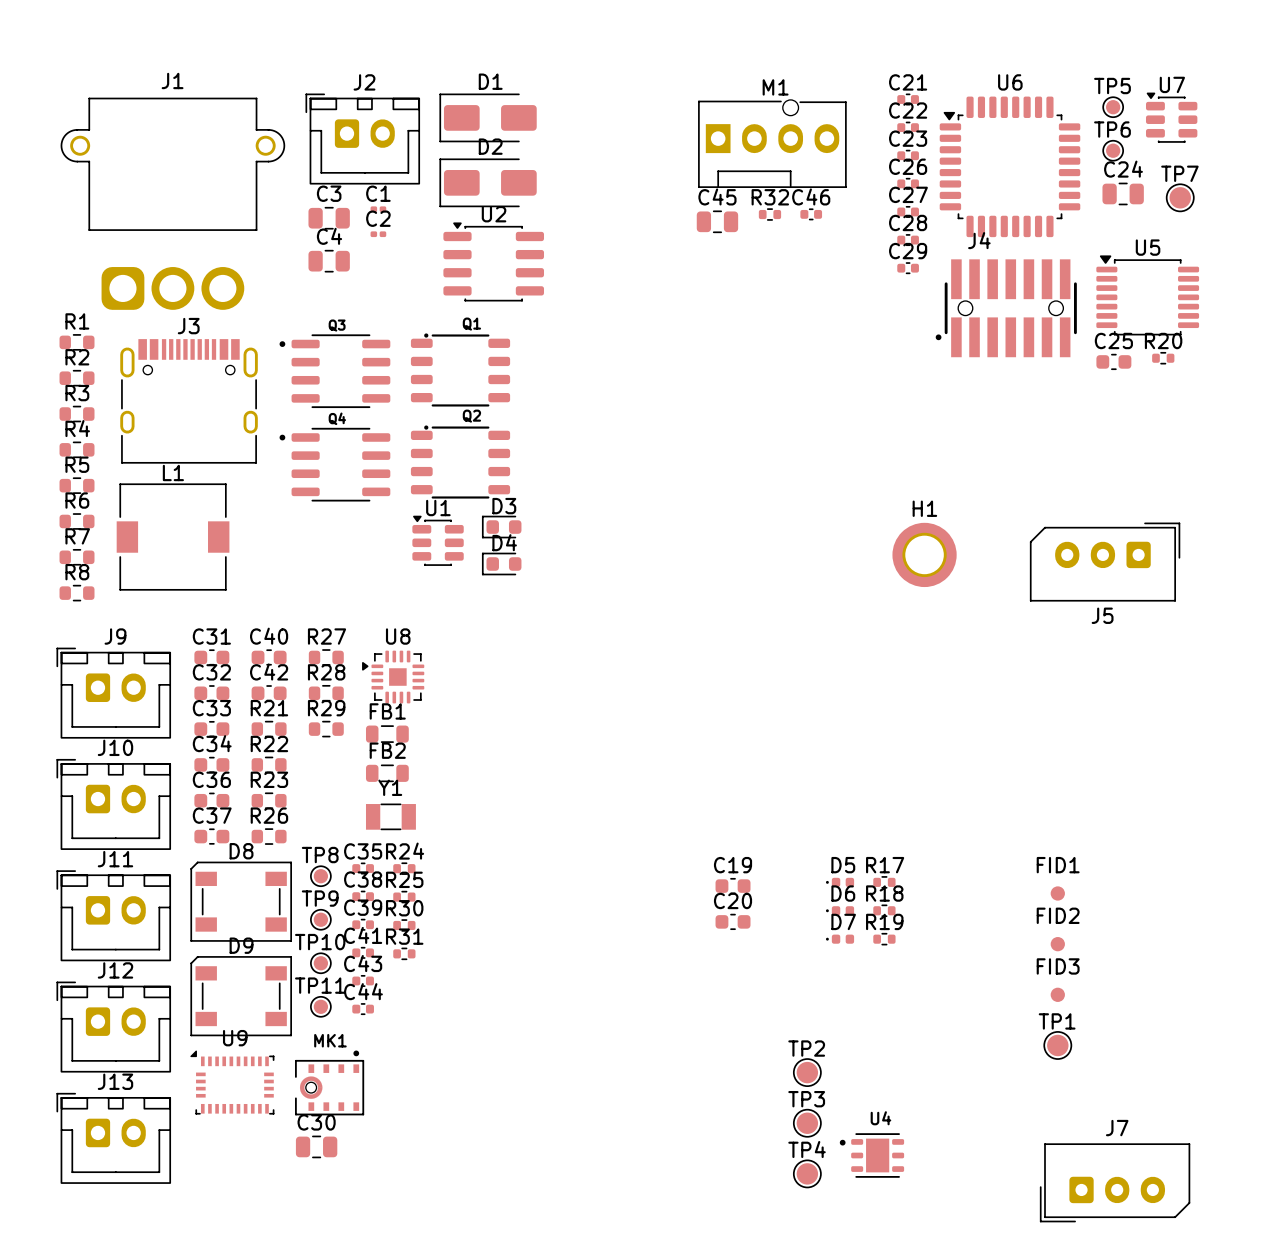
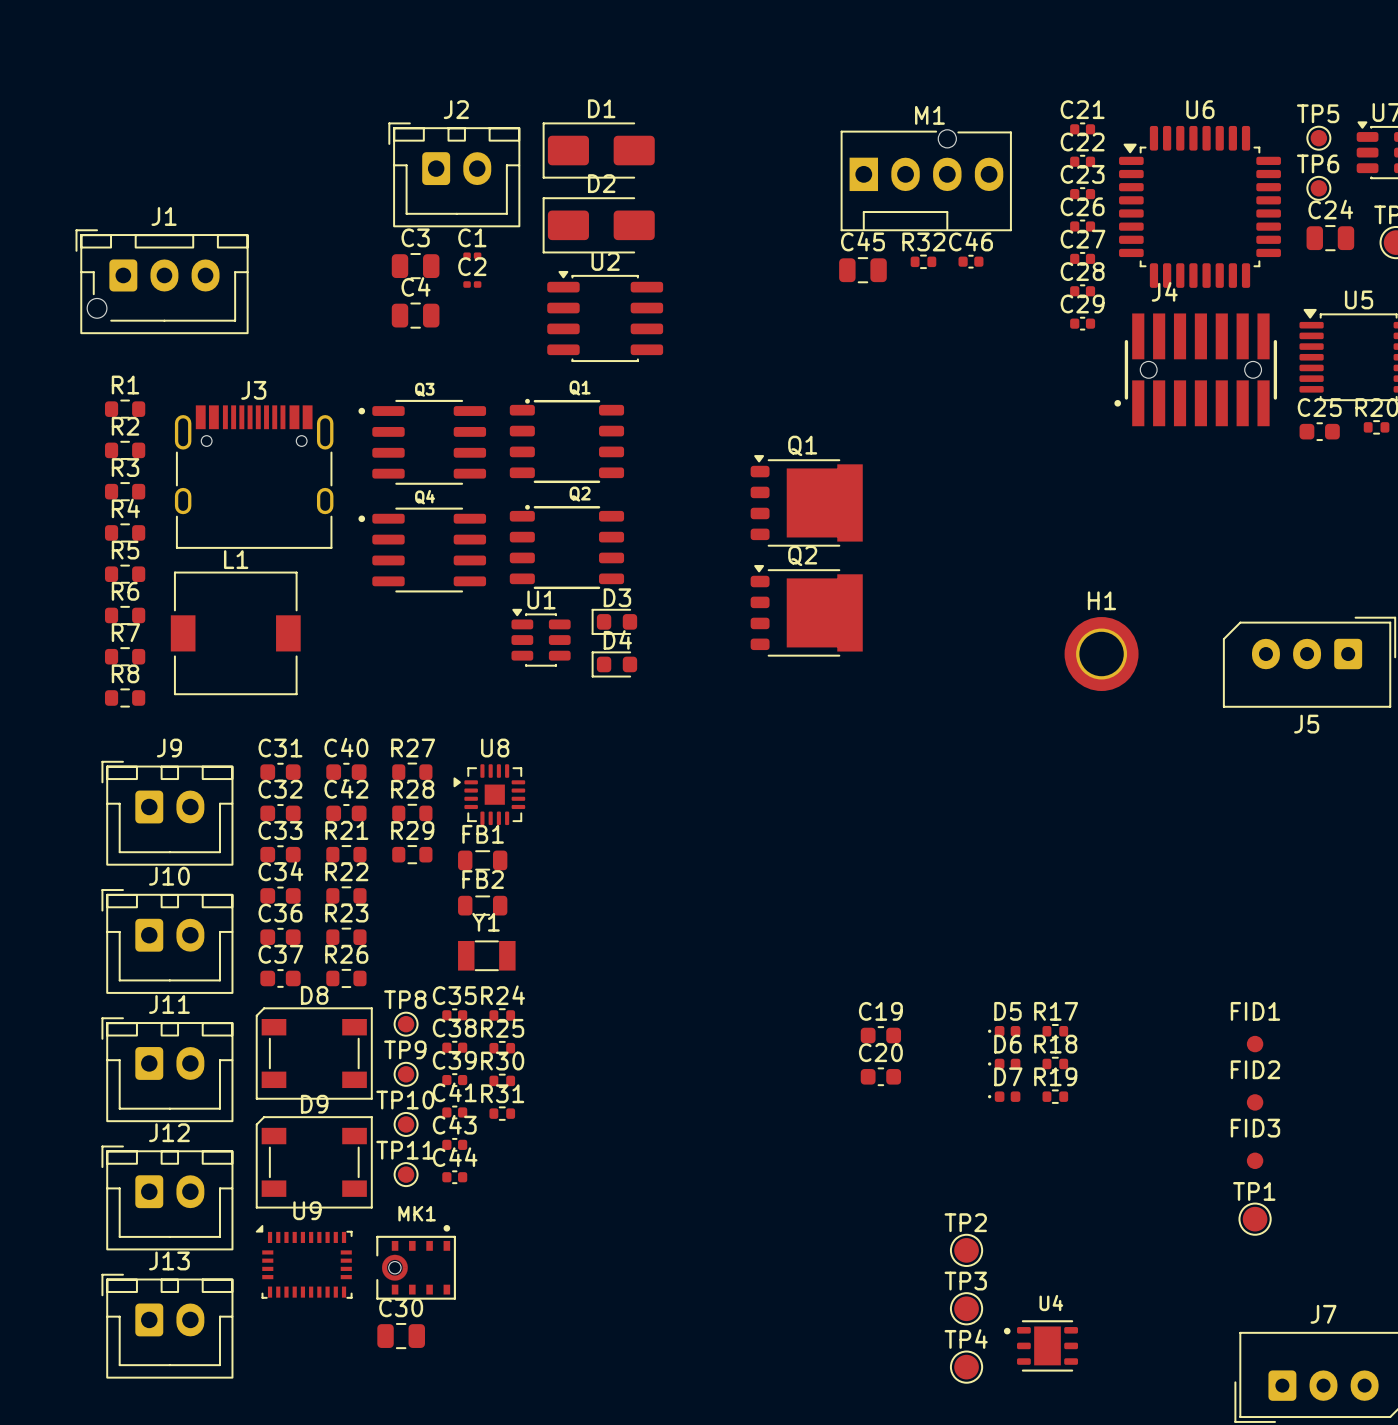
J1 name position: J1 (172, 80) -> J1 (164, 216)
J1 footprint: [60, 97, 286, 310] -> [75, 229, 249, 335]
Q1: none -> (806, 500)
Q2: none -> (806, 610)

